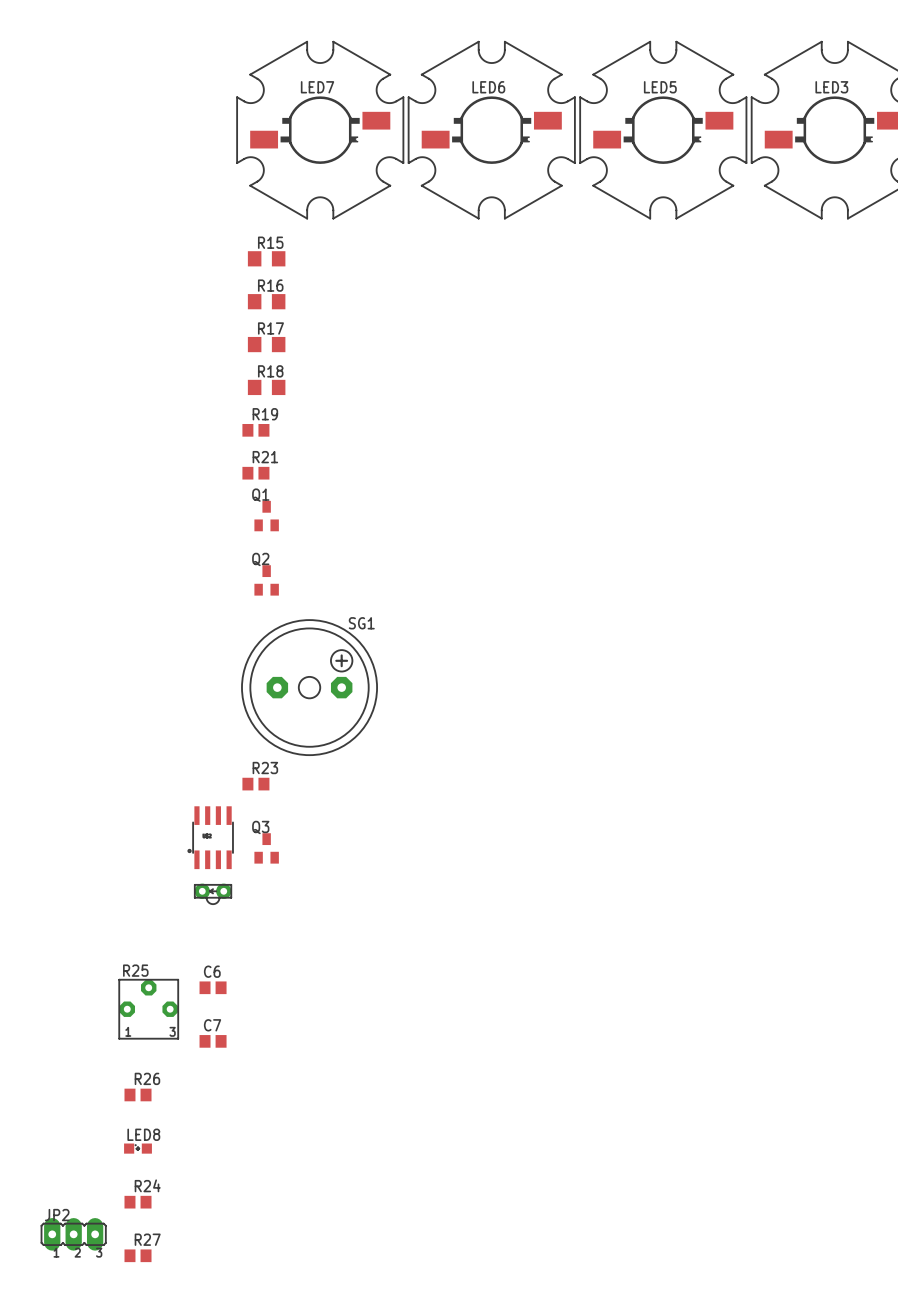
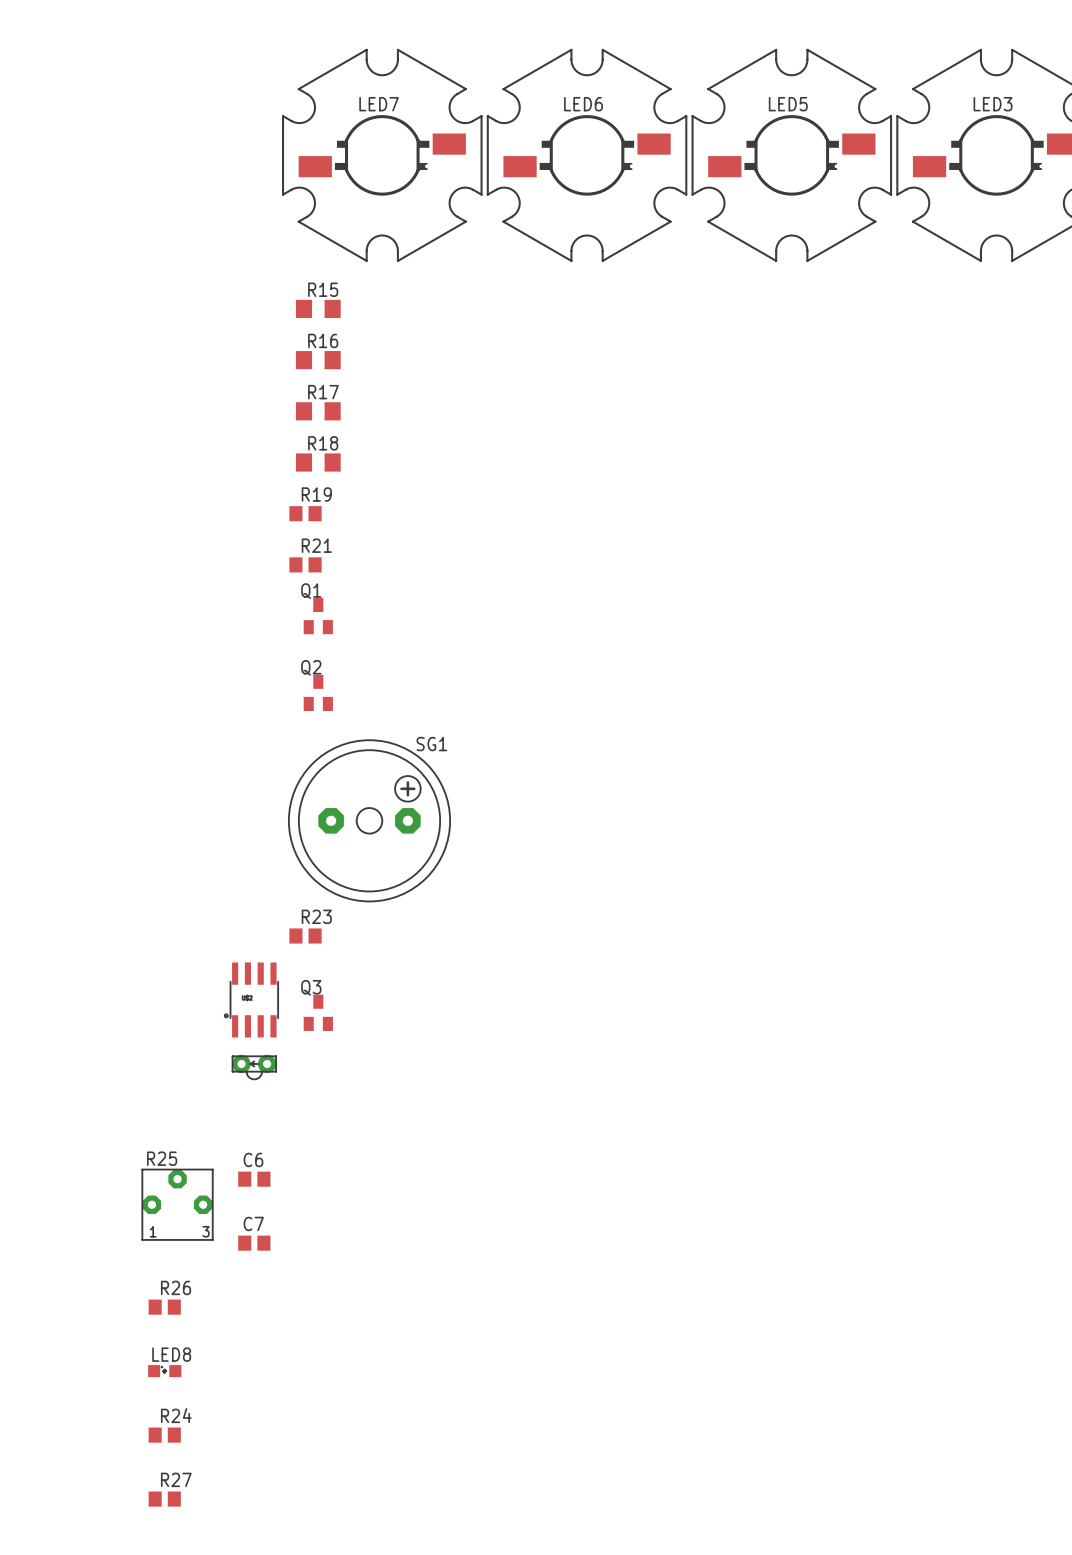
JP2: (73, 1234) -> none

